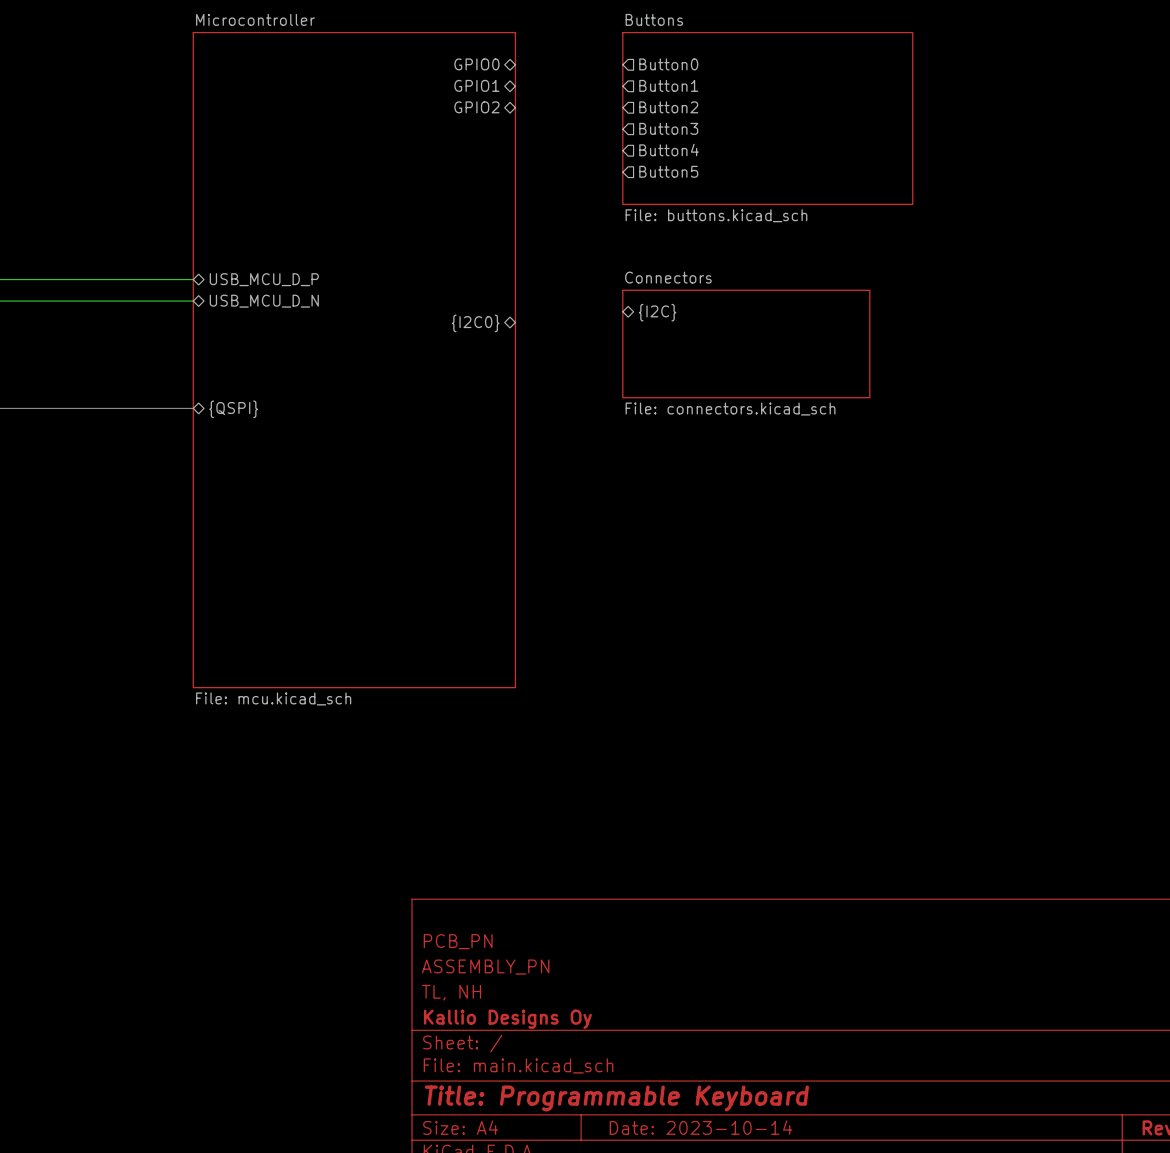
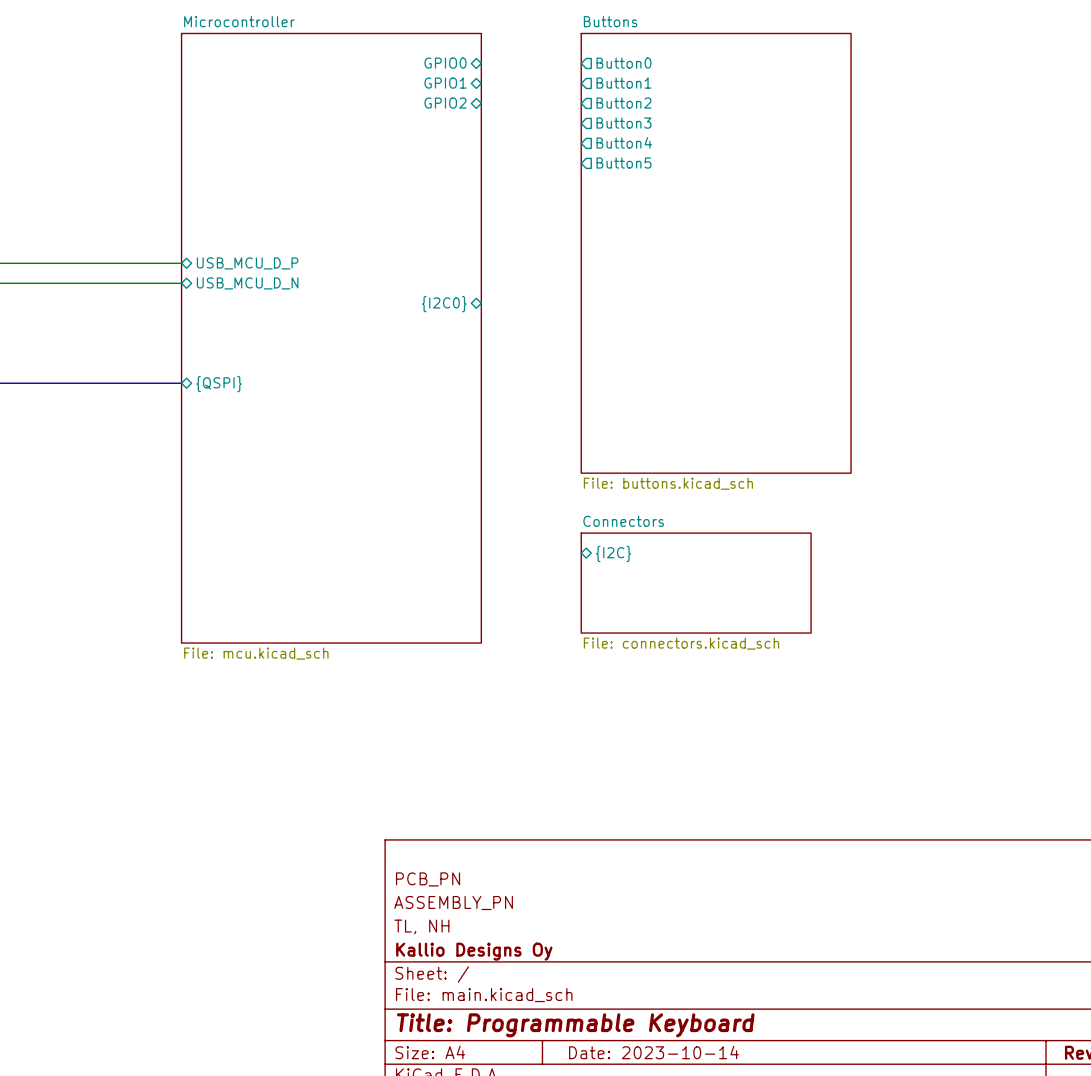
sheet Buttons: File: buttons.kicad_sch (767, 118) -> none
sheet Buttons: none -> File: buttons.kicad_sch (716, 253)
sheet pin: {I2C} (657, 312) -> none
sheet Connectors: File: connectors.kicad_sch (746, 343) -> none
sheet pin: none -> {I2C} (613, 553)
sheet Connectors: none -> File: connectors.kicad_sch (696, 583)

